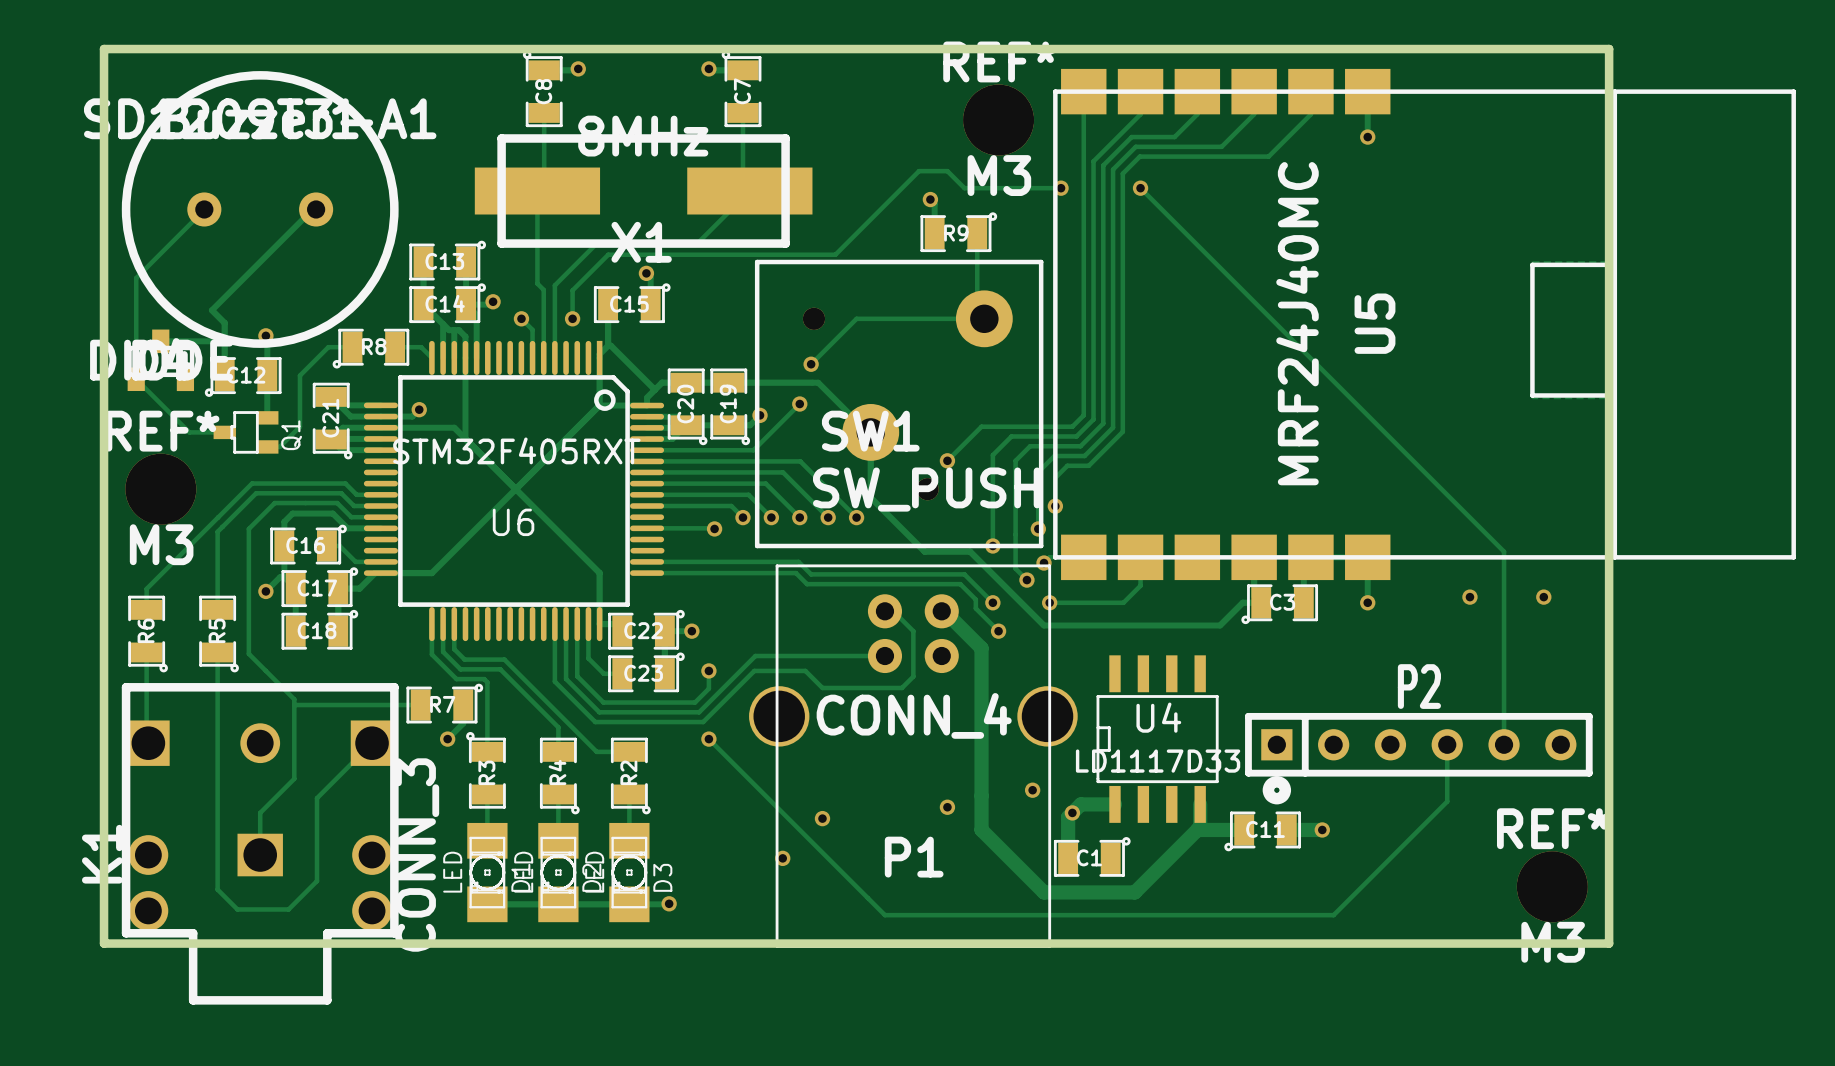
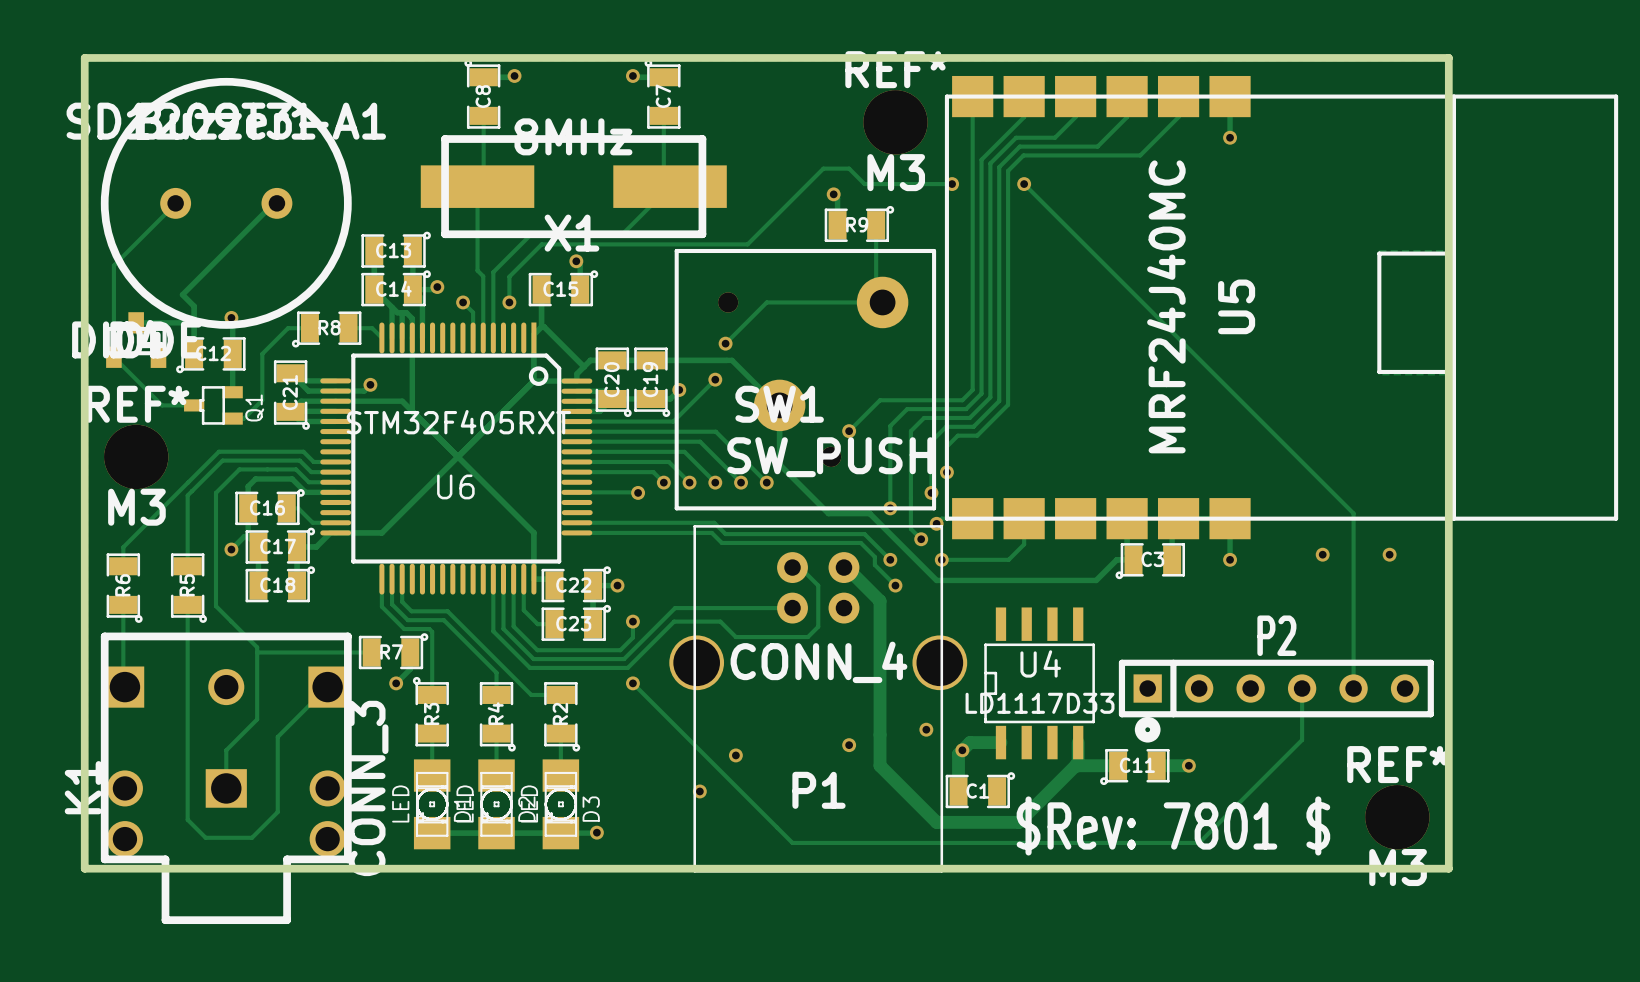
text: none -> $Rev: 7801 $ (1173, 825)

